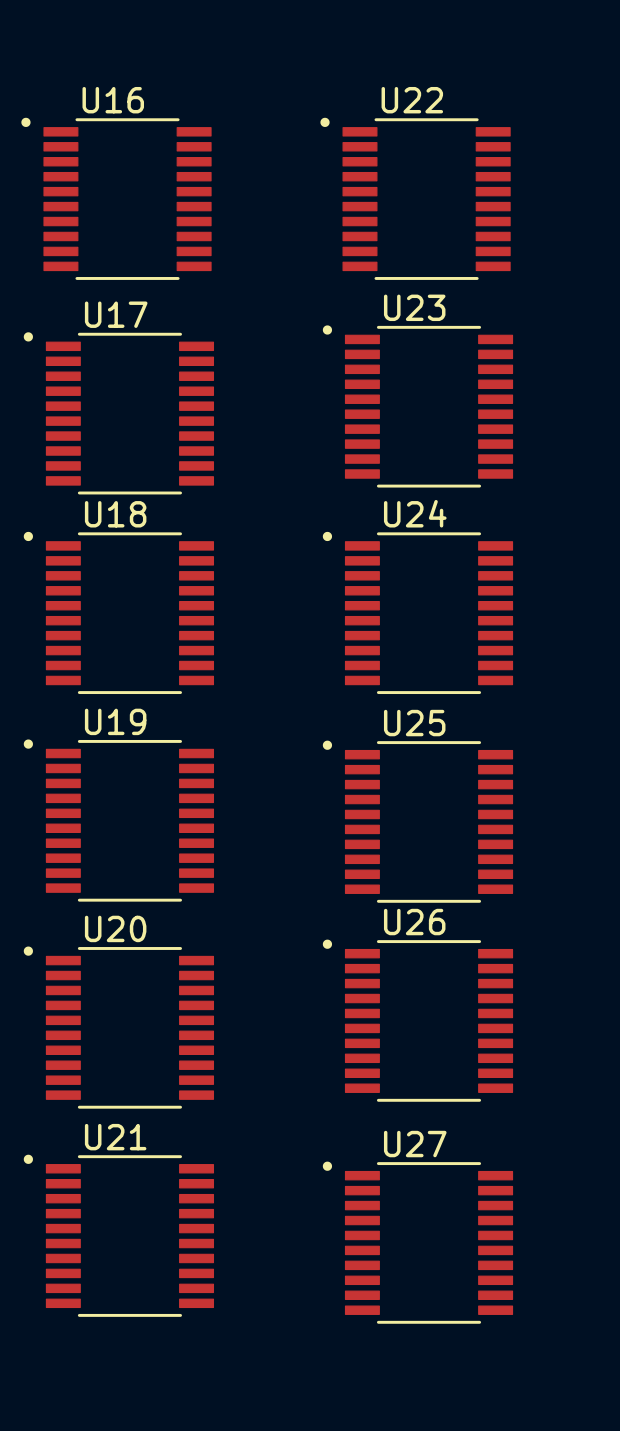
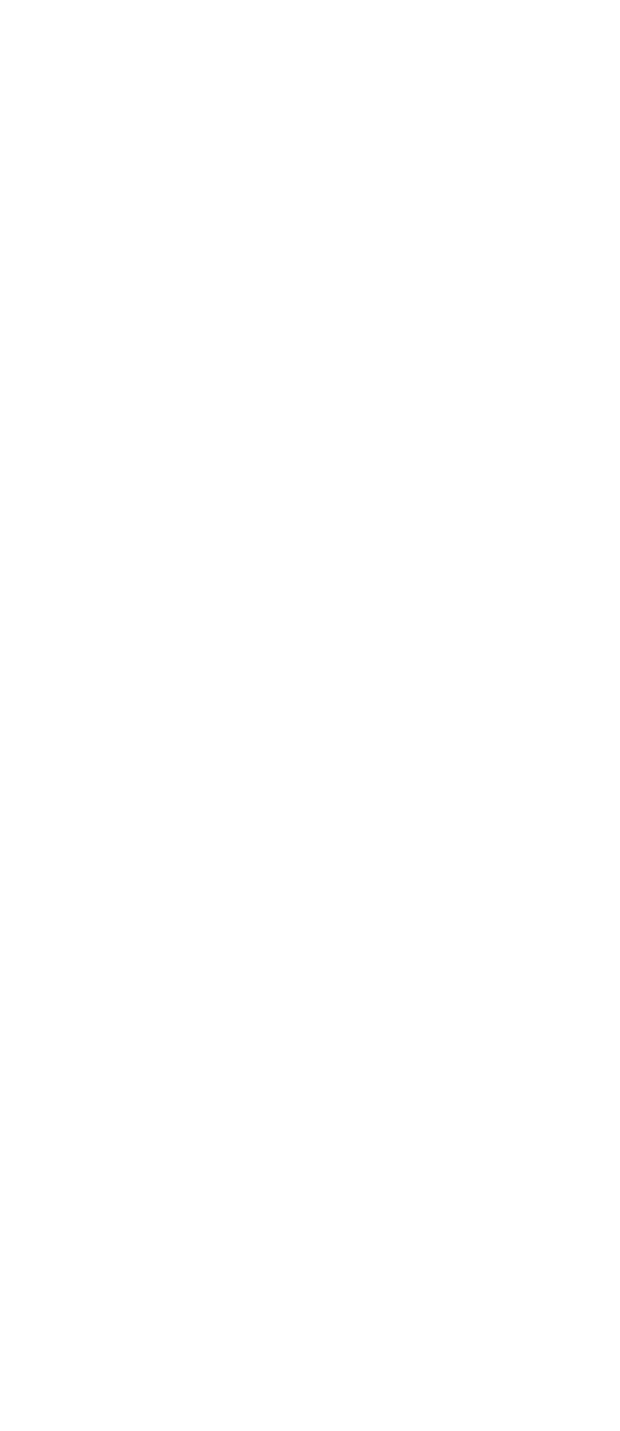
U16: (116, 198) -> none
U22: (415, 198) -> none
U23: (417, 406) -> none
U17: (118, 413) -> none
U18: (118, 612) -> none
U24: (417, 612) -> none
U19: (118, 820) -> none
U25: (417, 821) -> none
U26: (417, 1020) -> none
U20: (118, 1027) -> none
U21: (118, 1235) -> none
U27: (417, 1242) -> none

